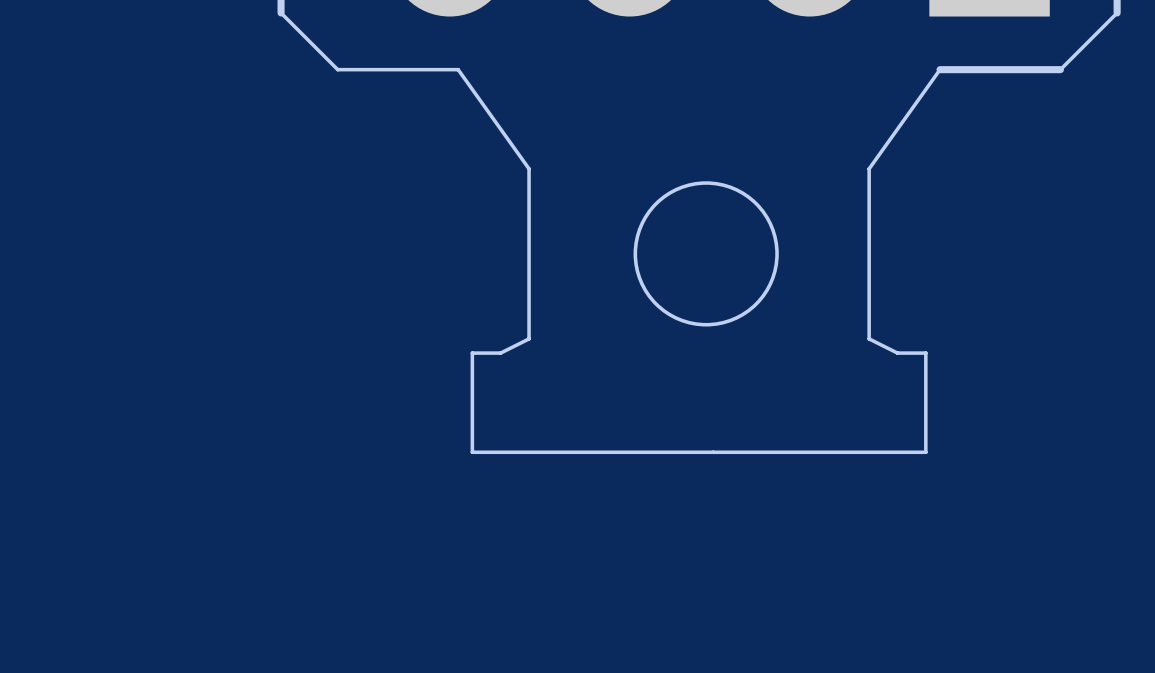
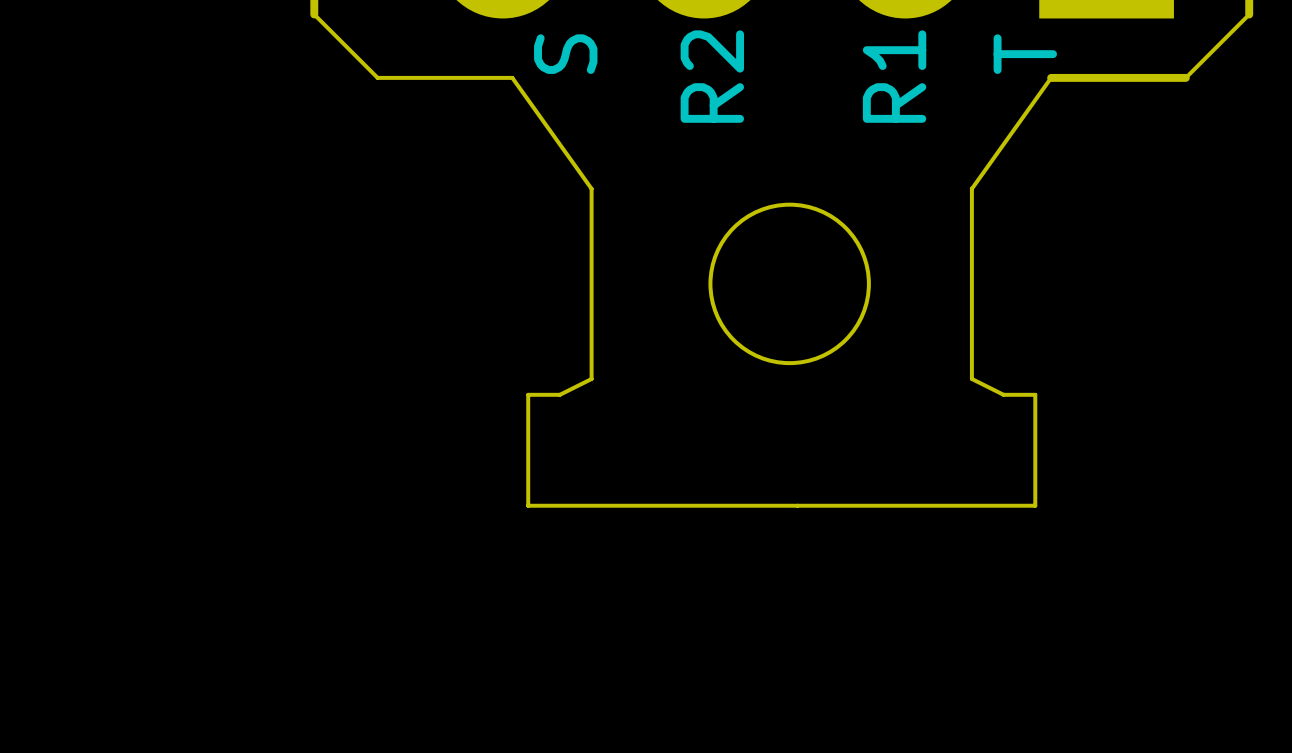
text: none -> S (565, 54)
text: none -> T (1025, 54)
text: none -> R2 (712, 76)
text: none -> R1 (894, 76)

